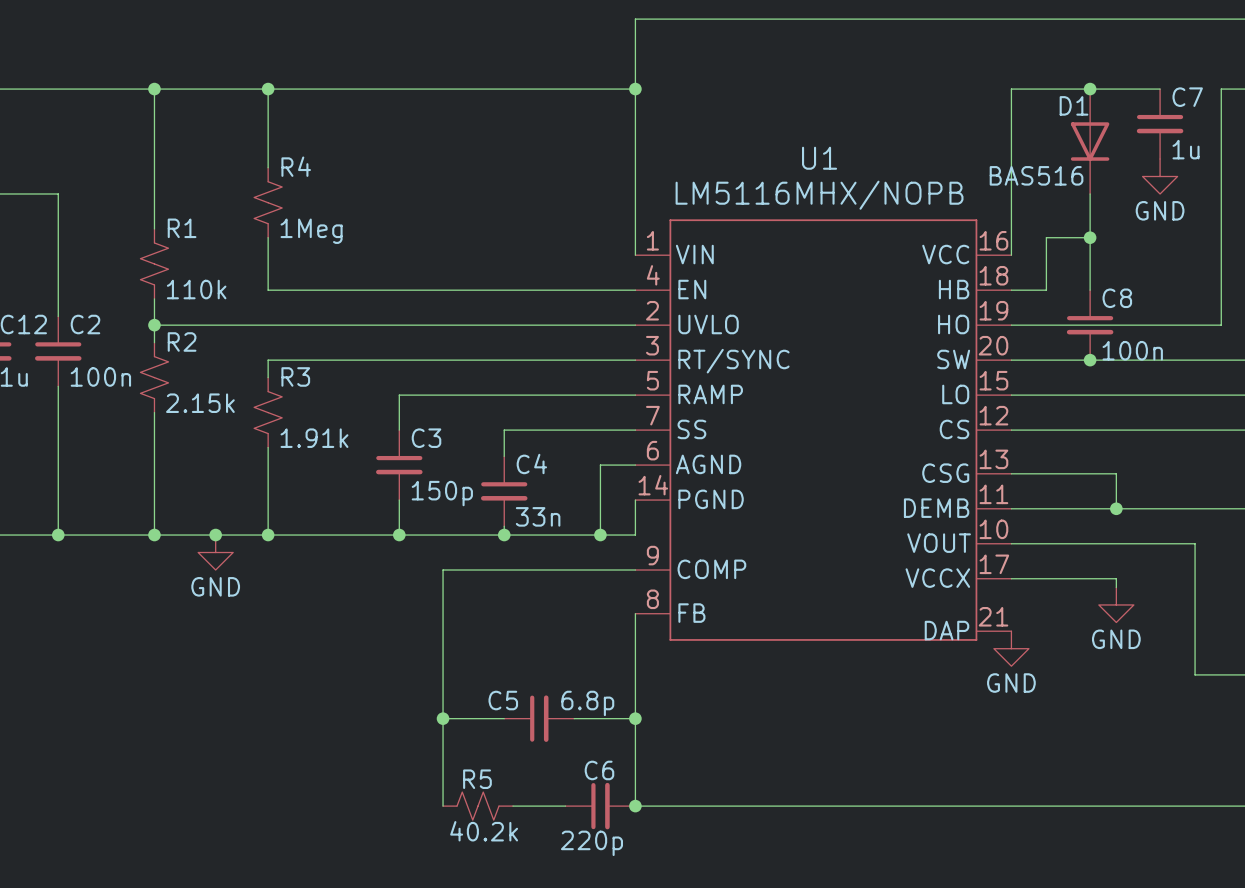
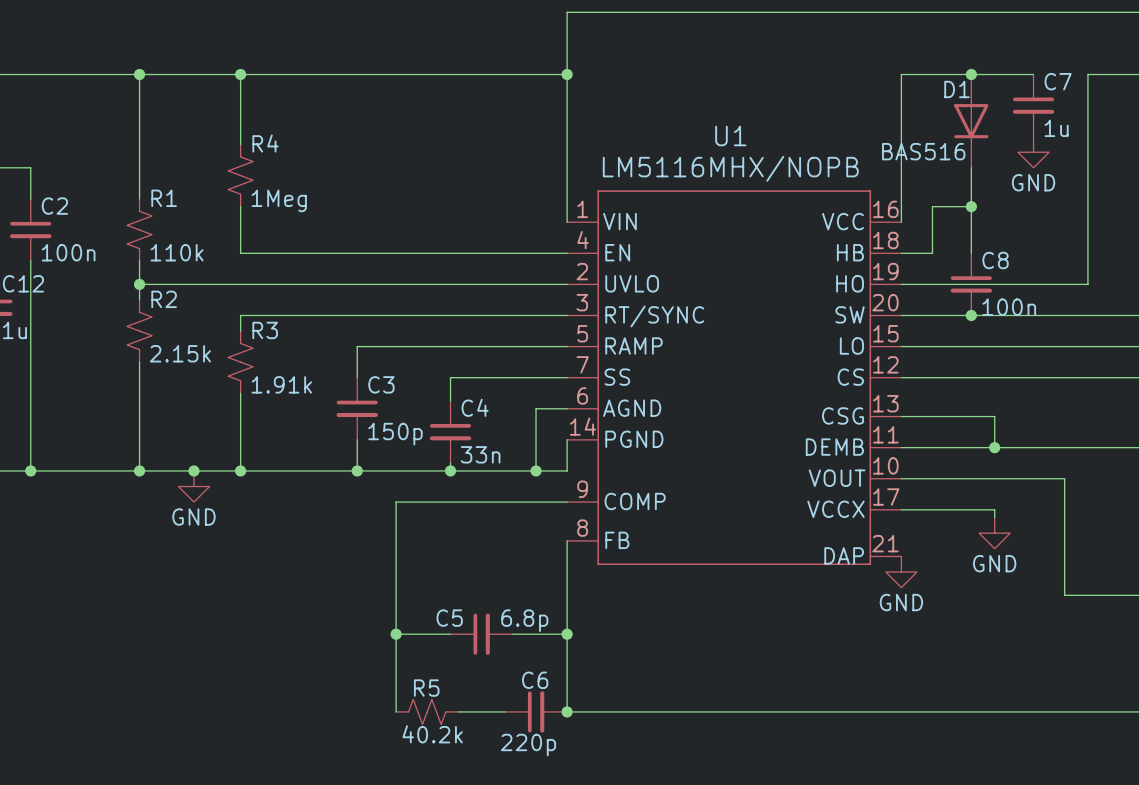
wire: (32, 193) (58, 193) (58, 316) -> (30, 167) (30, 198)
wire: none -> (30, 261) (30, 470)
C2 position: (58, 351) -> (30, 229)
wire: (58, 386) (58, 535) -> none
junction position: (58, 535) -> (30, 470)

